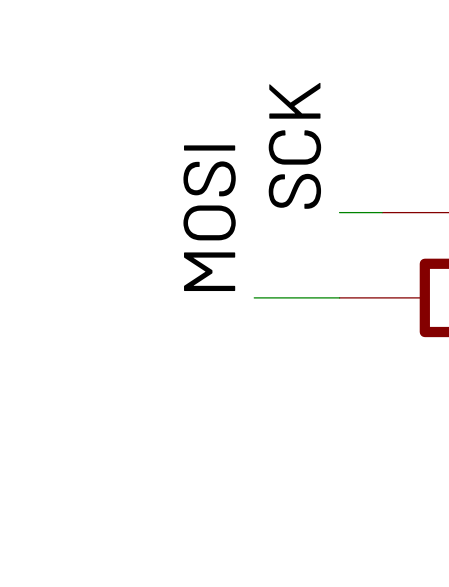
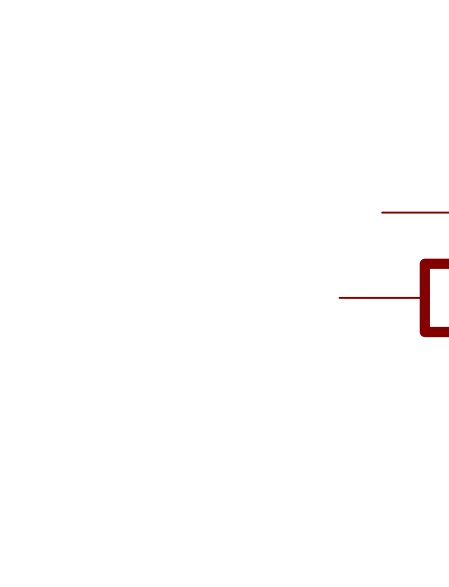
label: SCK (294, 145) -> none
wire: (339, 212) (382, 212) -> none
label: MOSI (209, 218) -> none
wire: (254, 297) (339, 297) -> none

